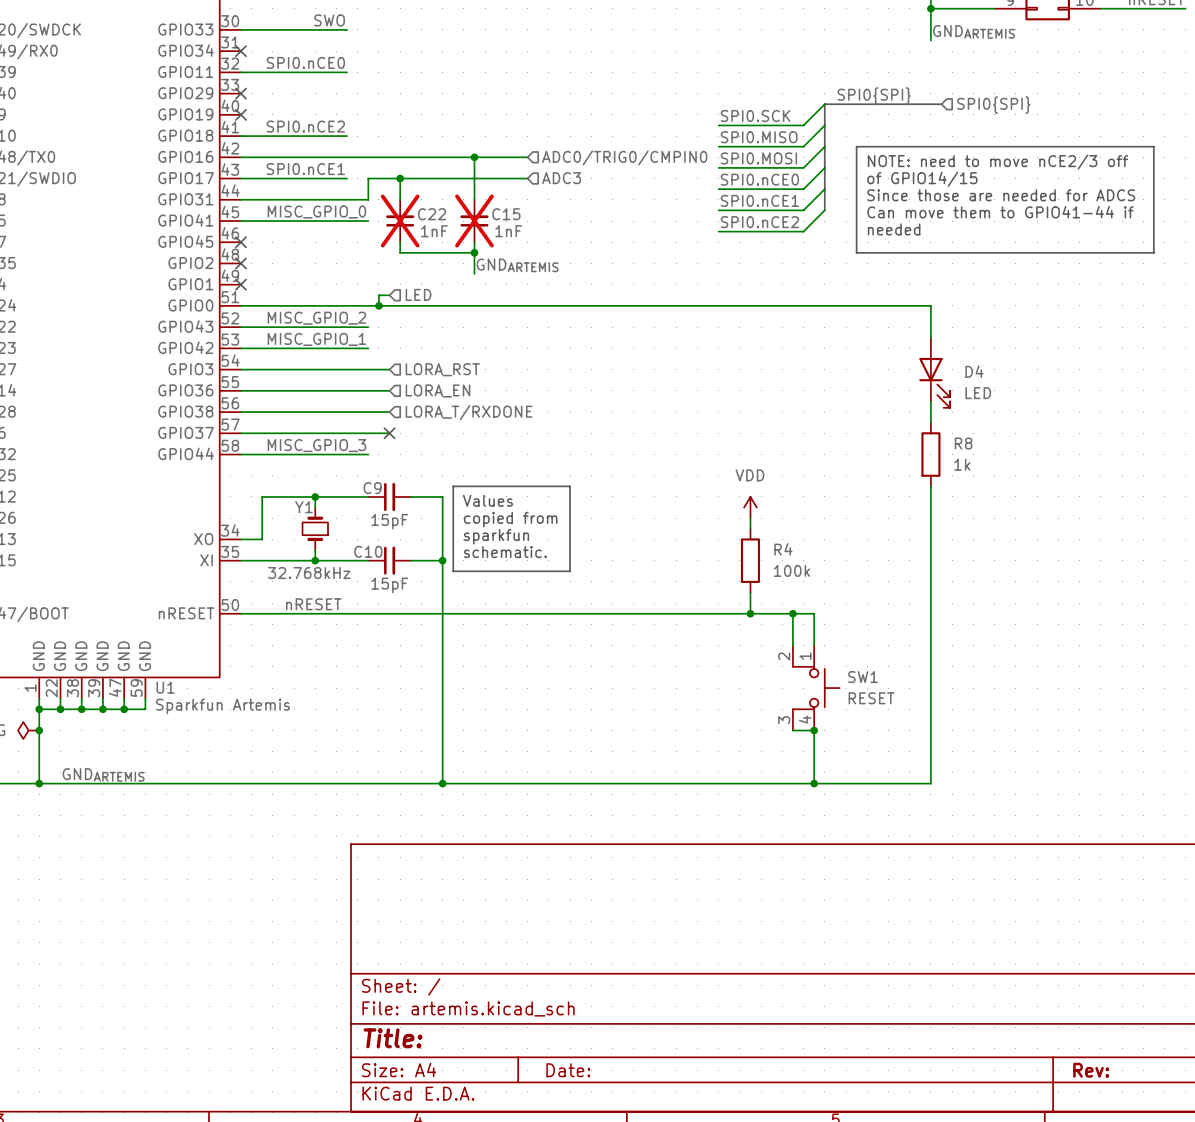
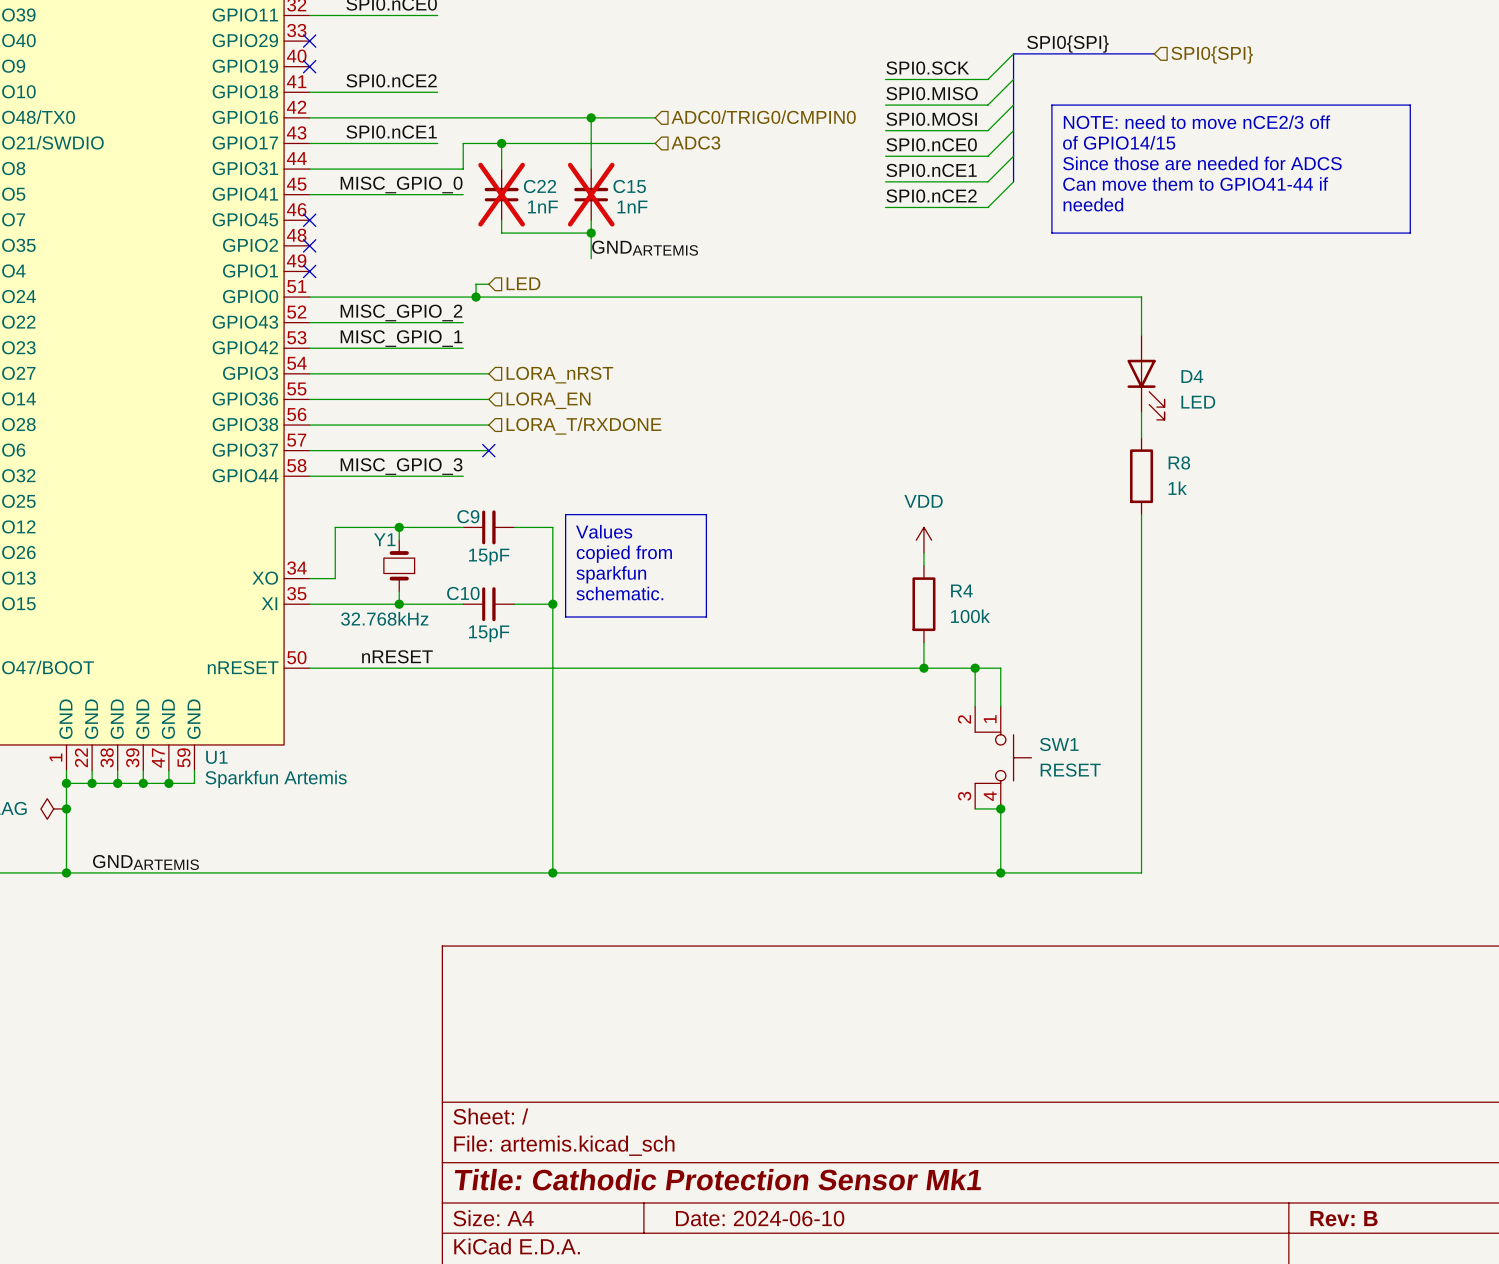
hierarchical label: LORA_RST (442, 369) -> LORA_nRST (559, 375)
title block: Title: (393, 1038) -> Title: Cathodic Protection Sensor Mk1 (717, 1179)
title block: Date: (568, 1070) -> Date: 2024-06-10 (760, 1218)
title block: Rev: (1091, 1070) -> Rev: B (1344, 1218)

